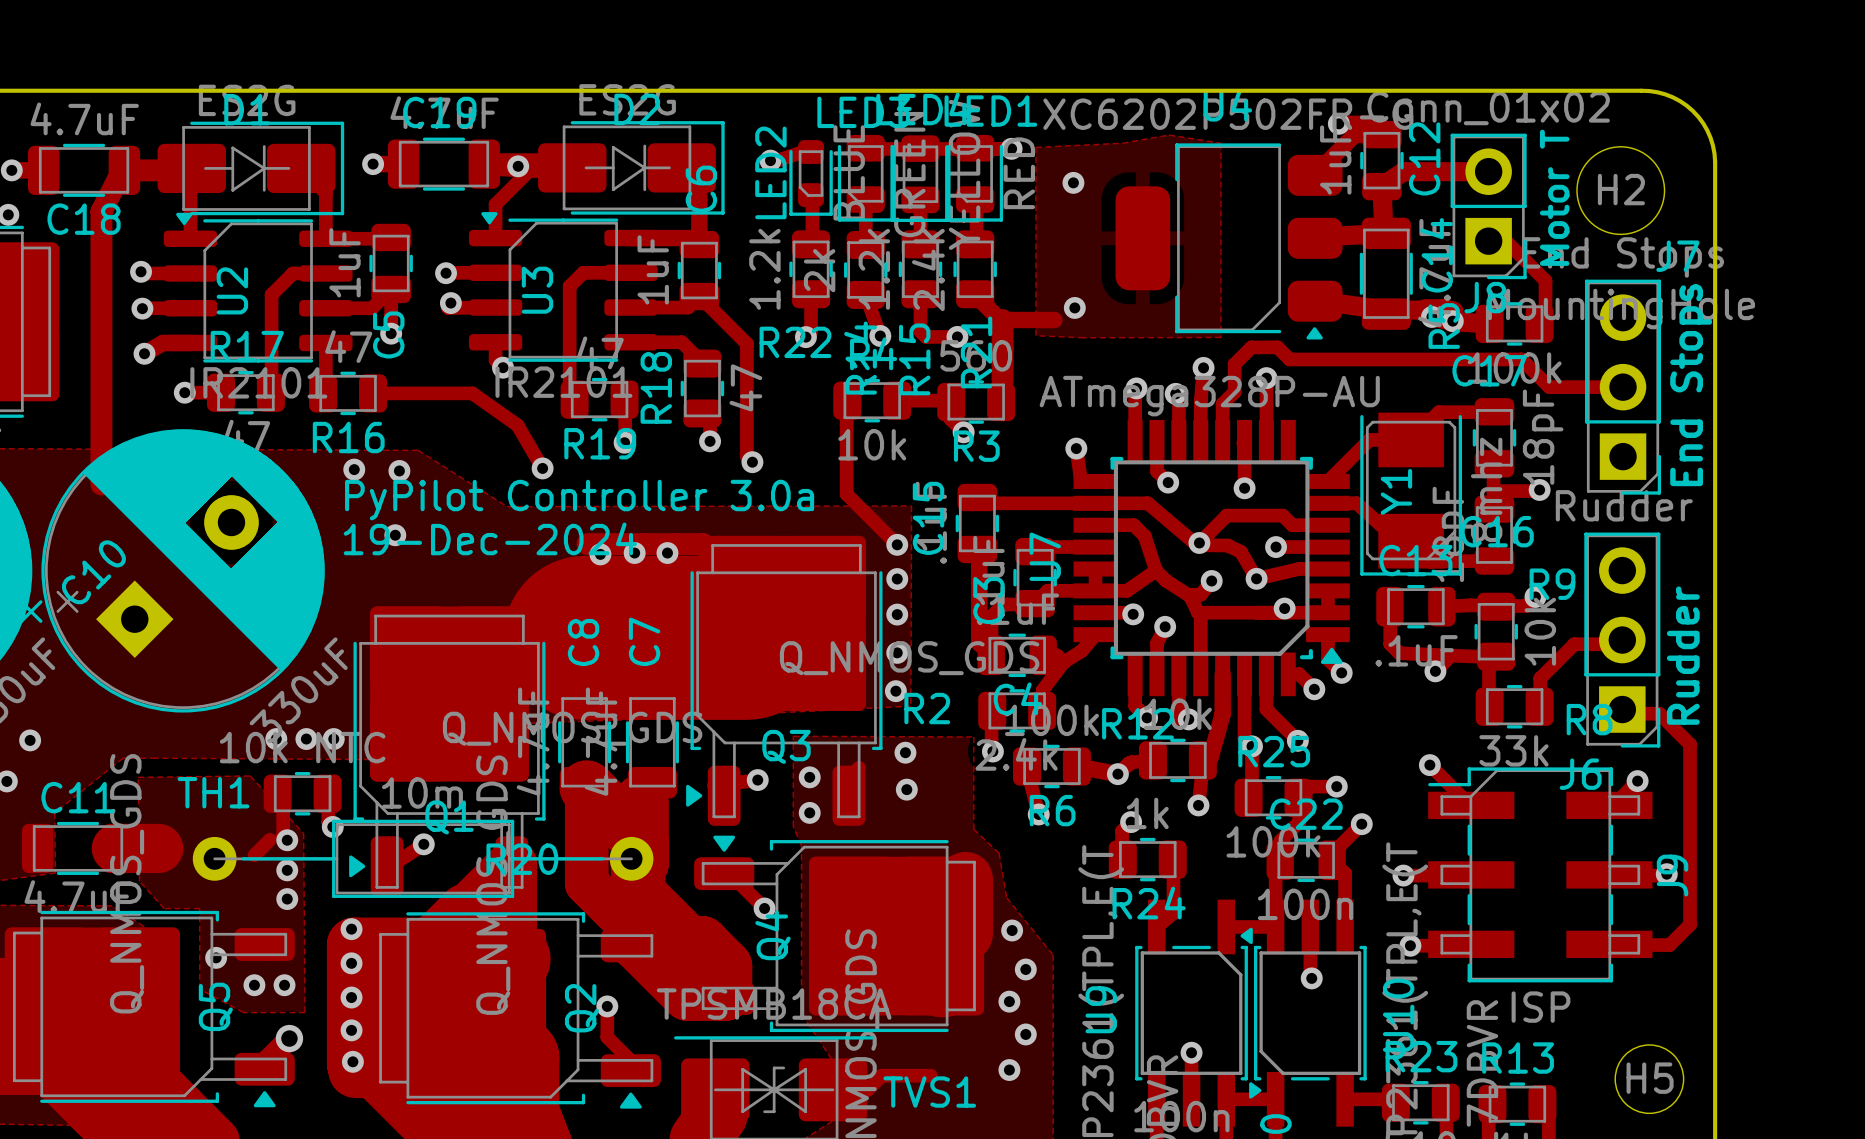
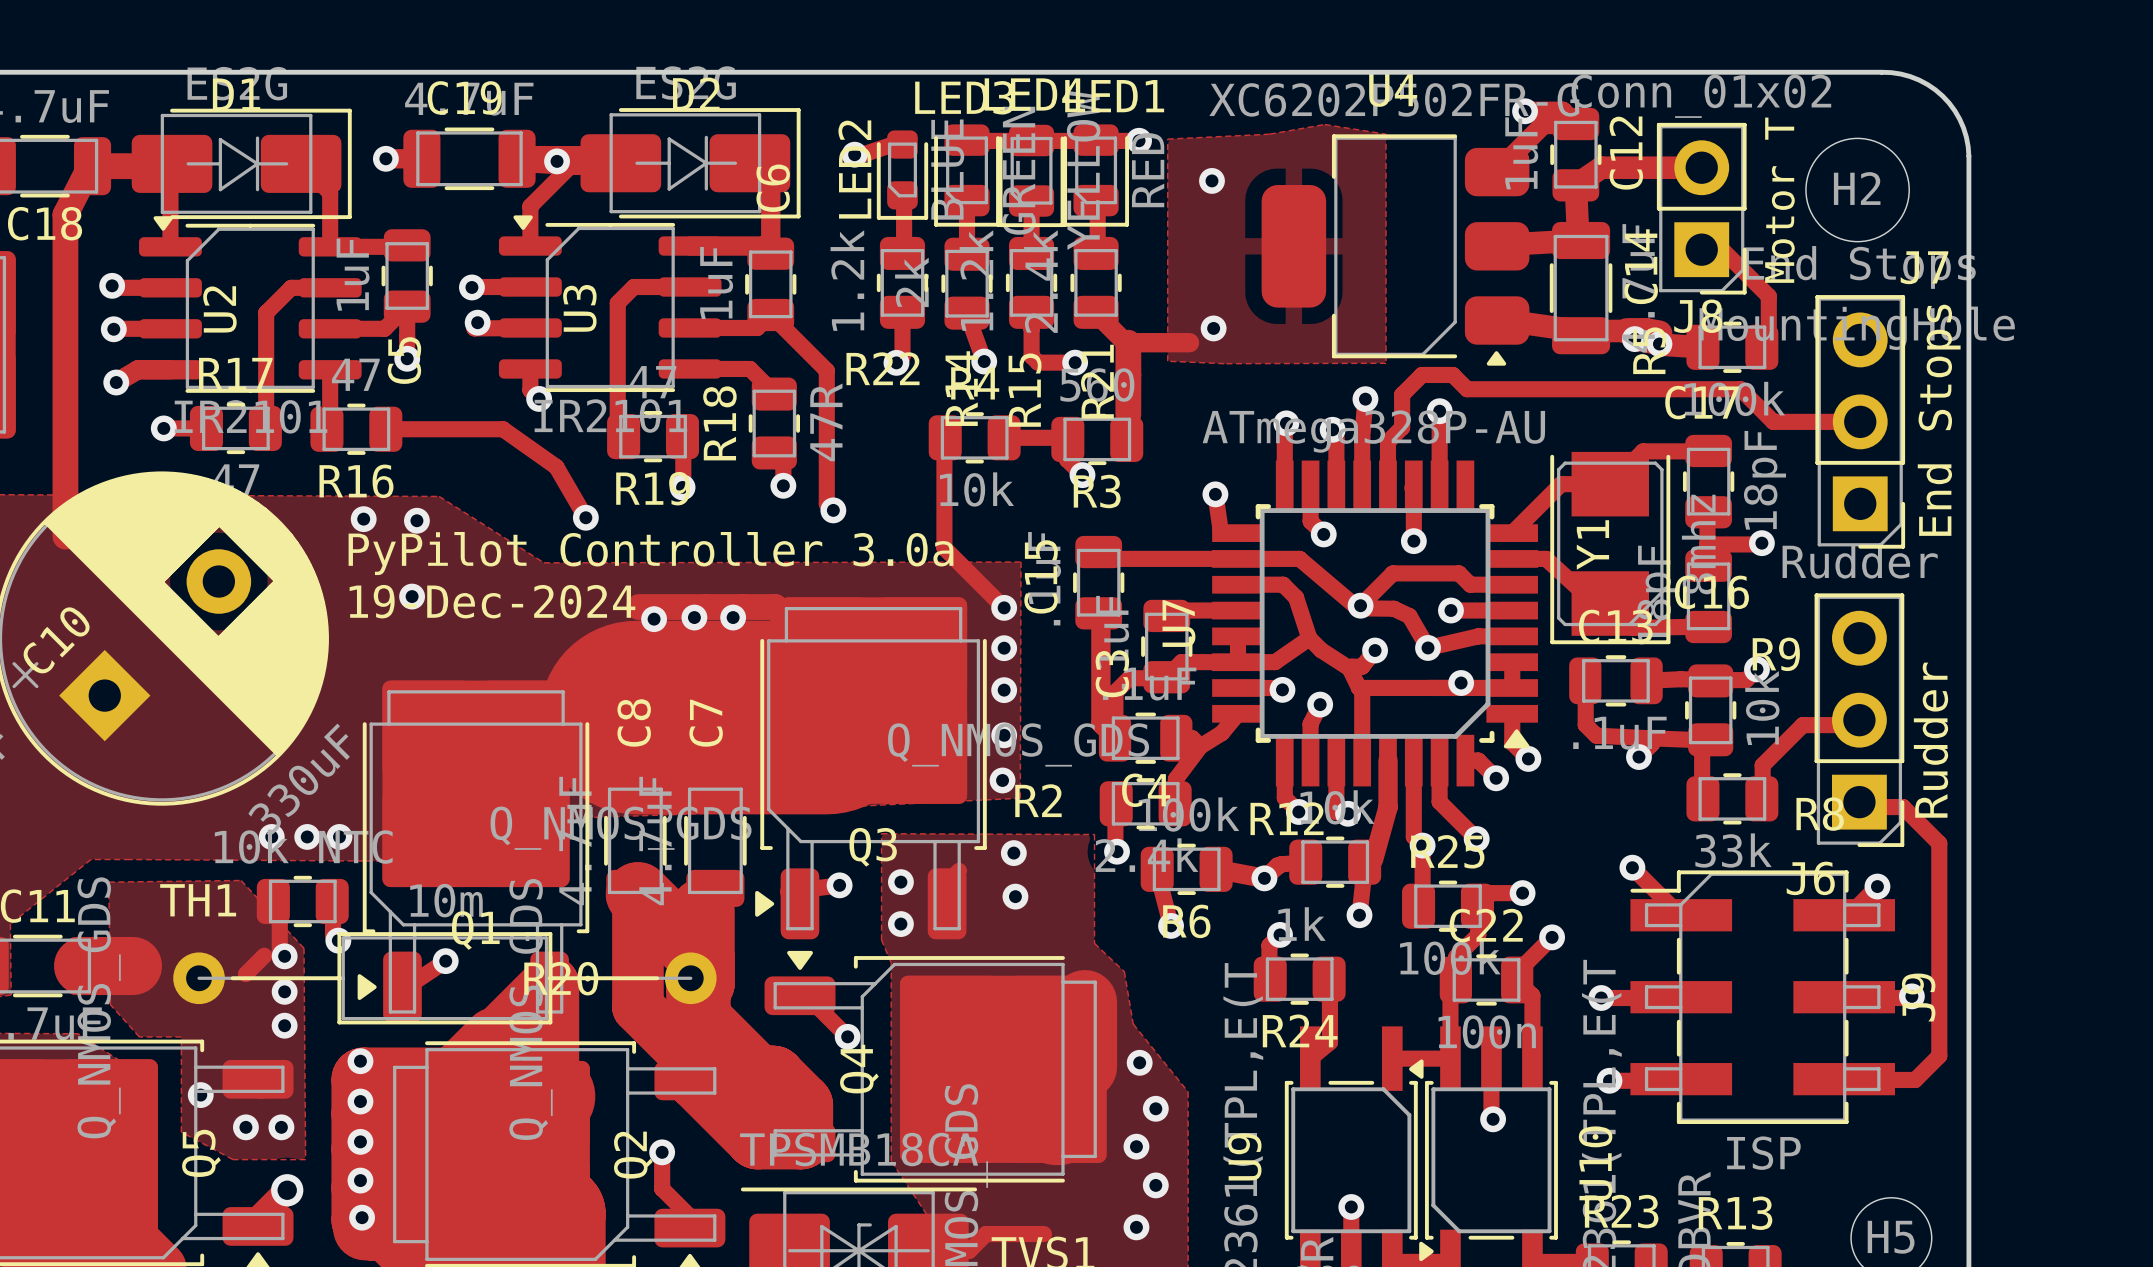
R18 value: 47 (745, 387) -> 47R (826, 422)

